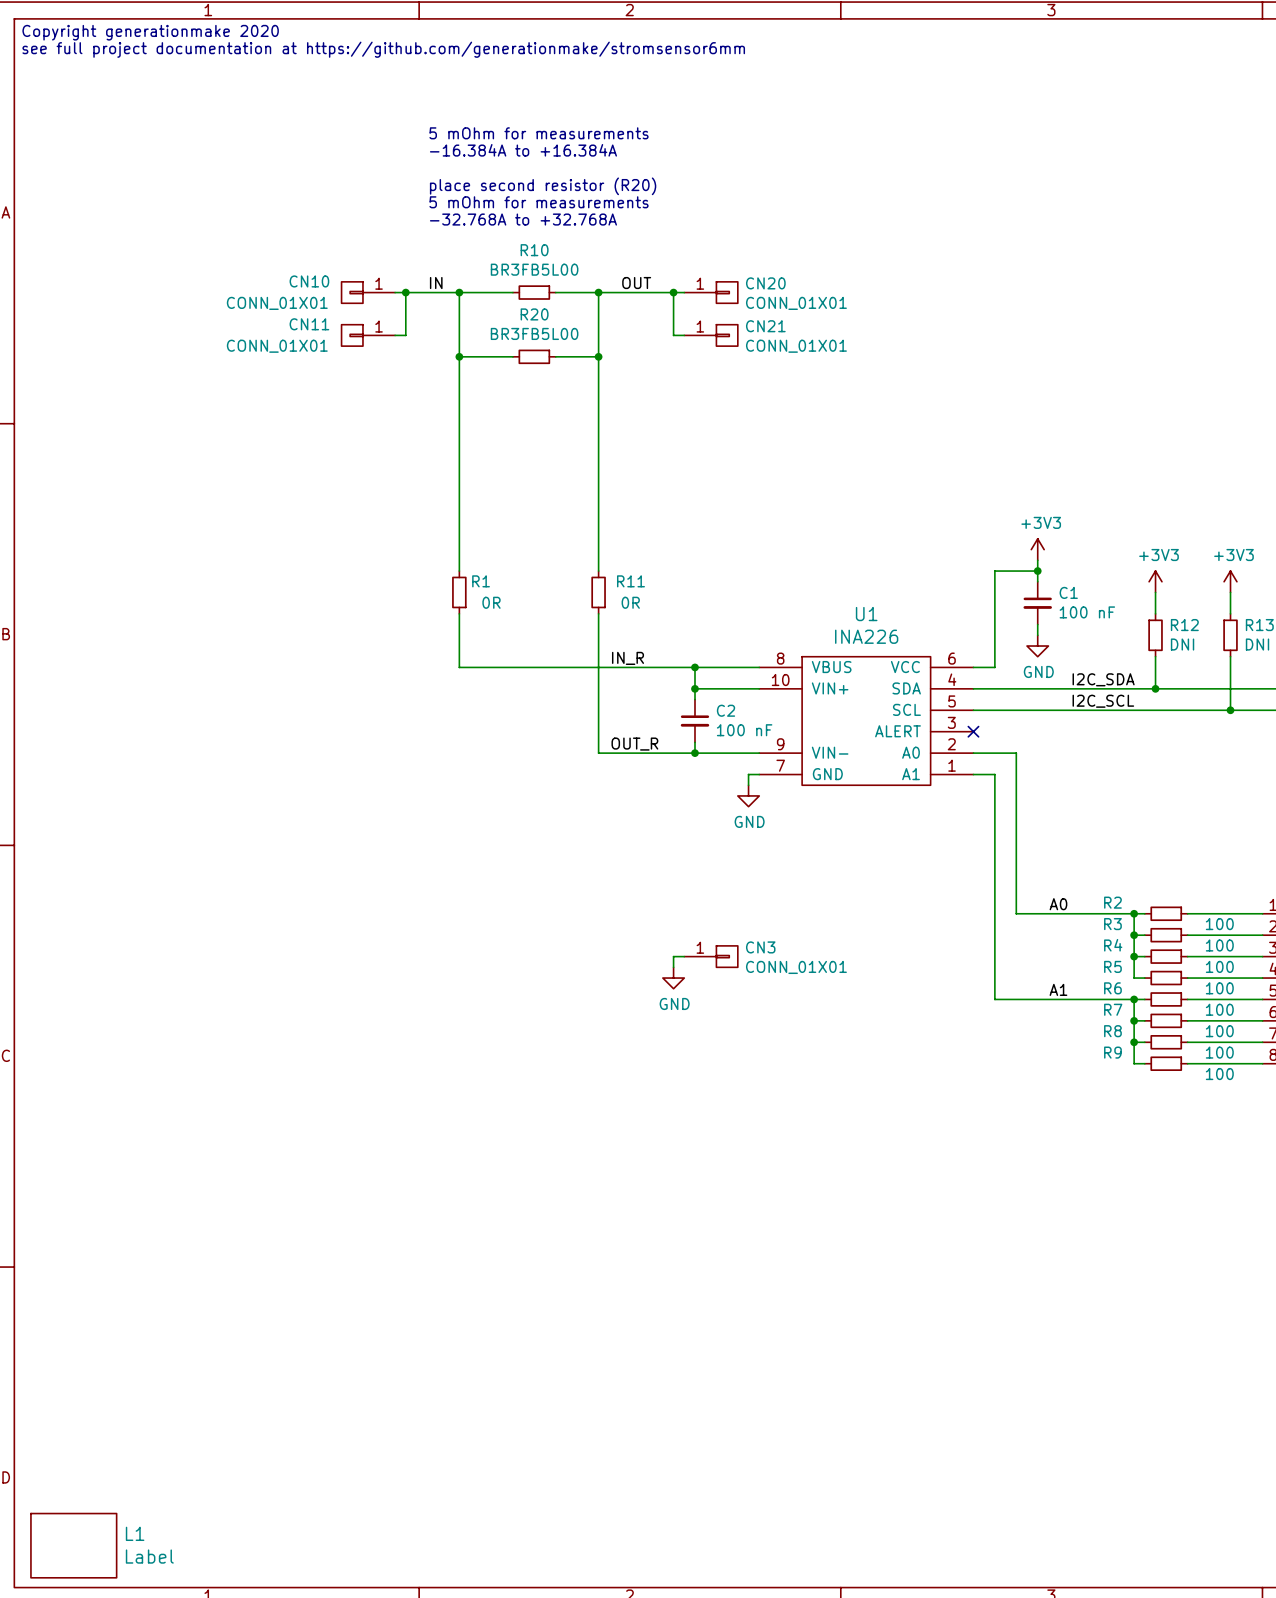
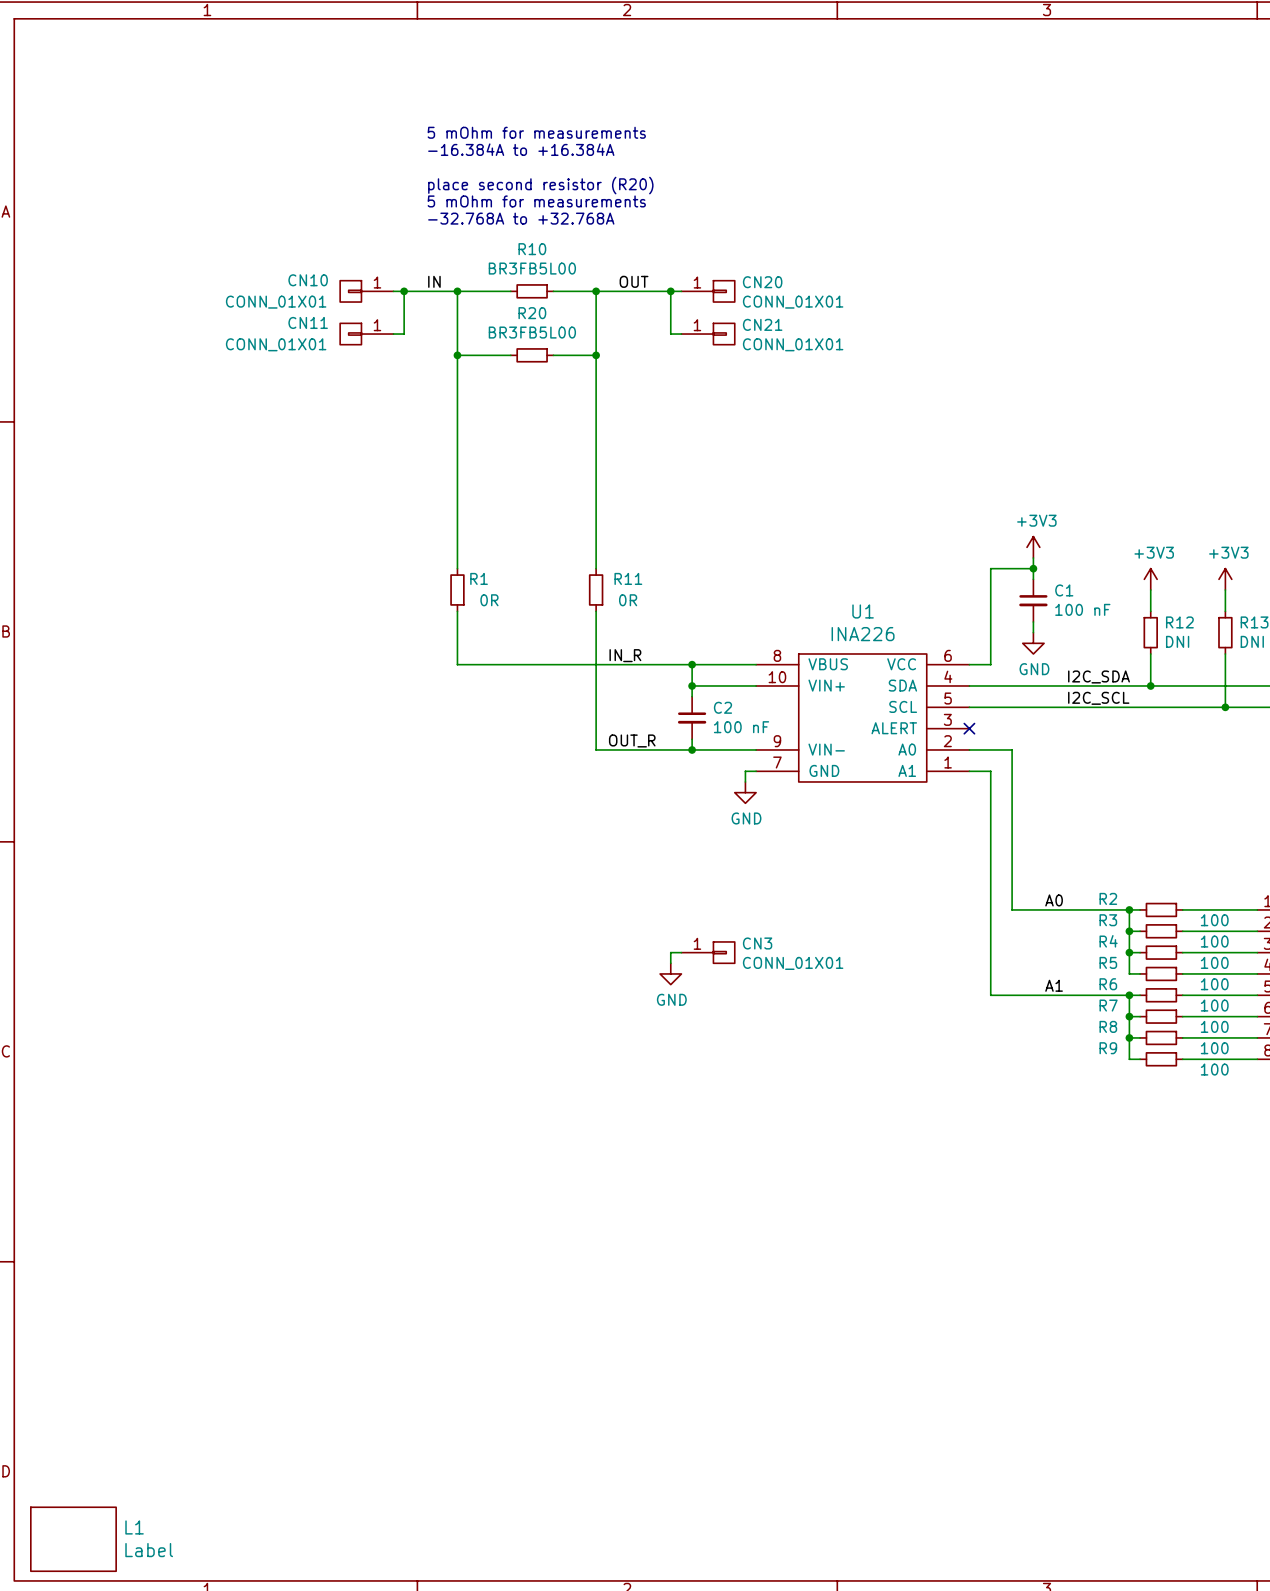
text: Copyright generationmake 2020 (150, 32) -> none
text: see full project documentation at https://github.com/generationmake/stromsensor6mm (383, 49) -> none

